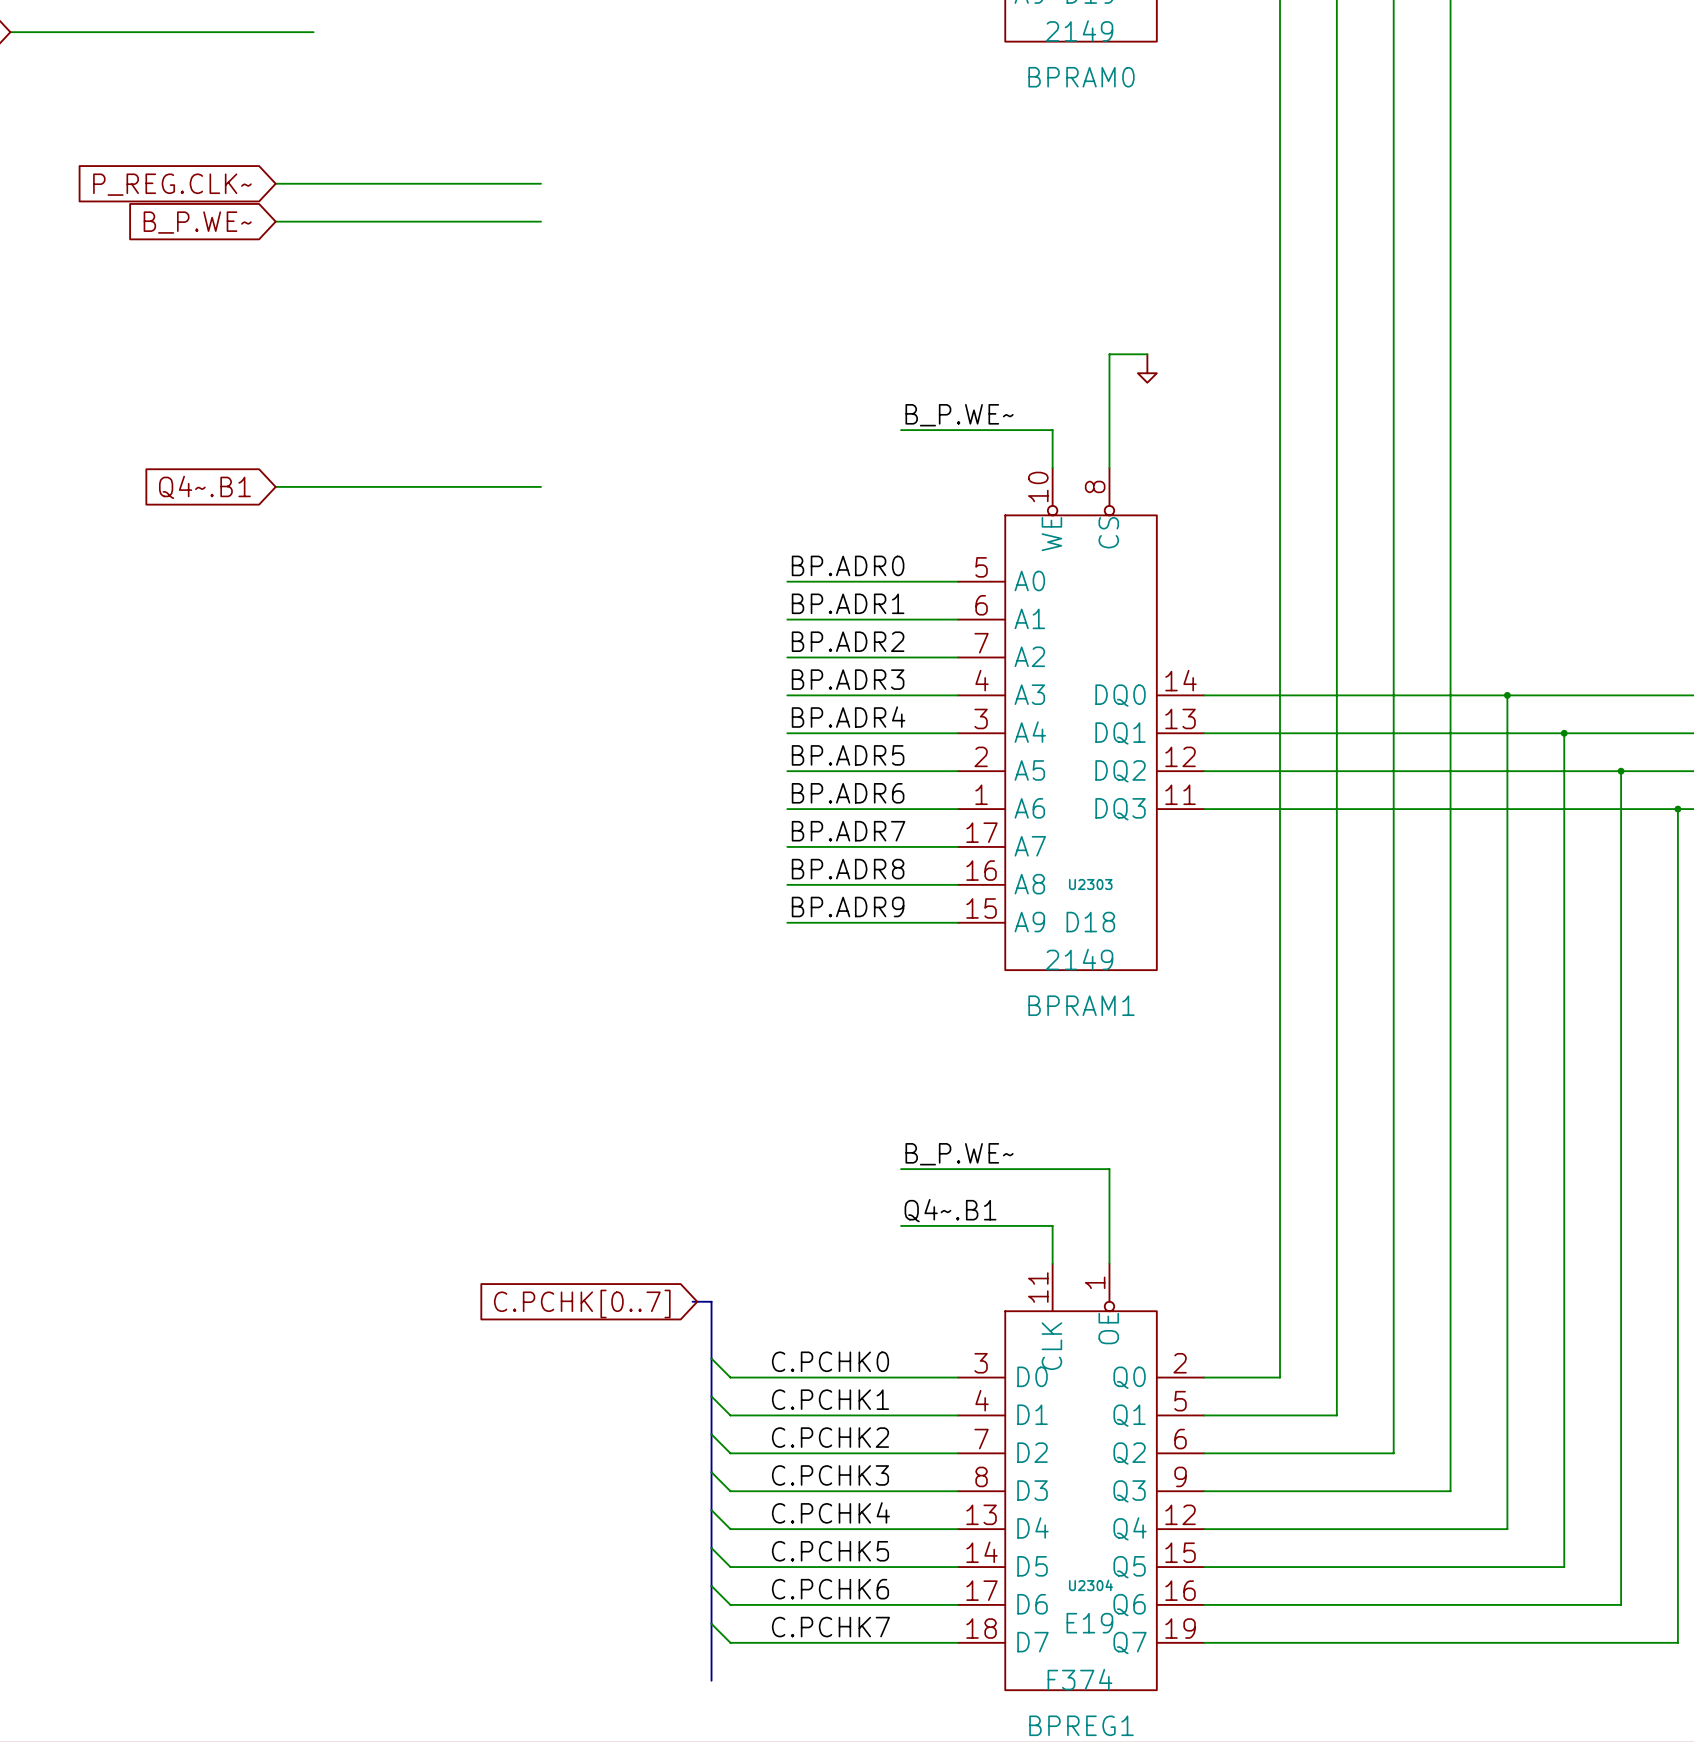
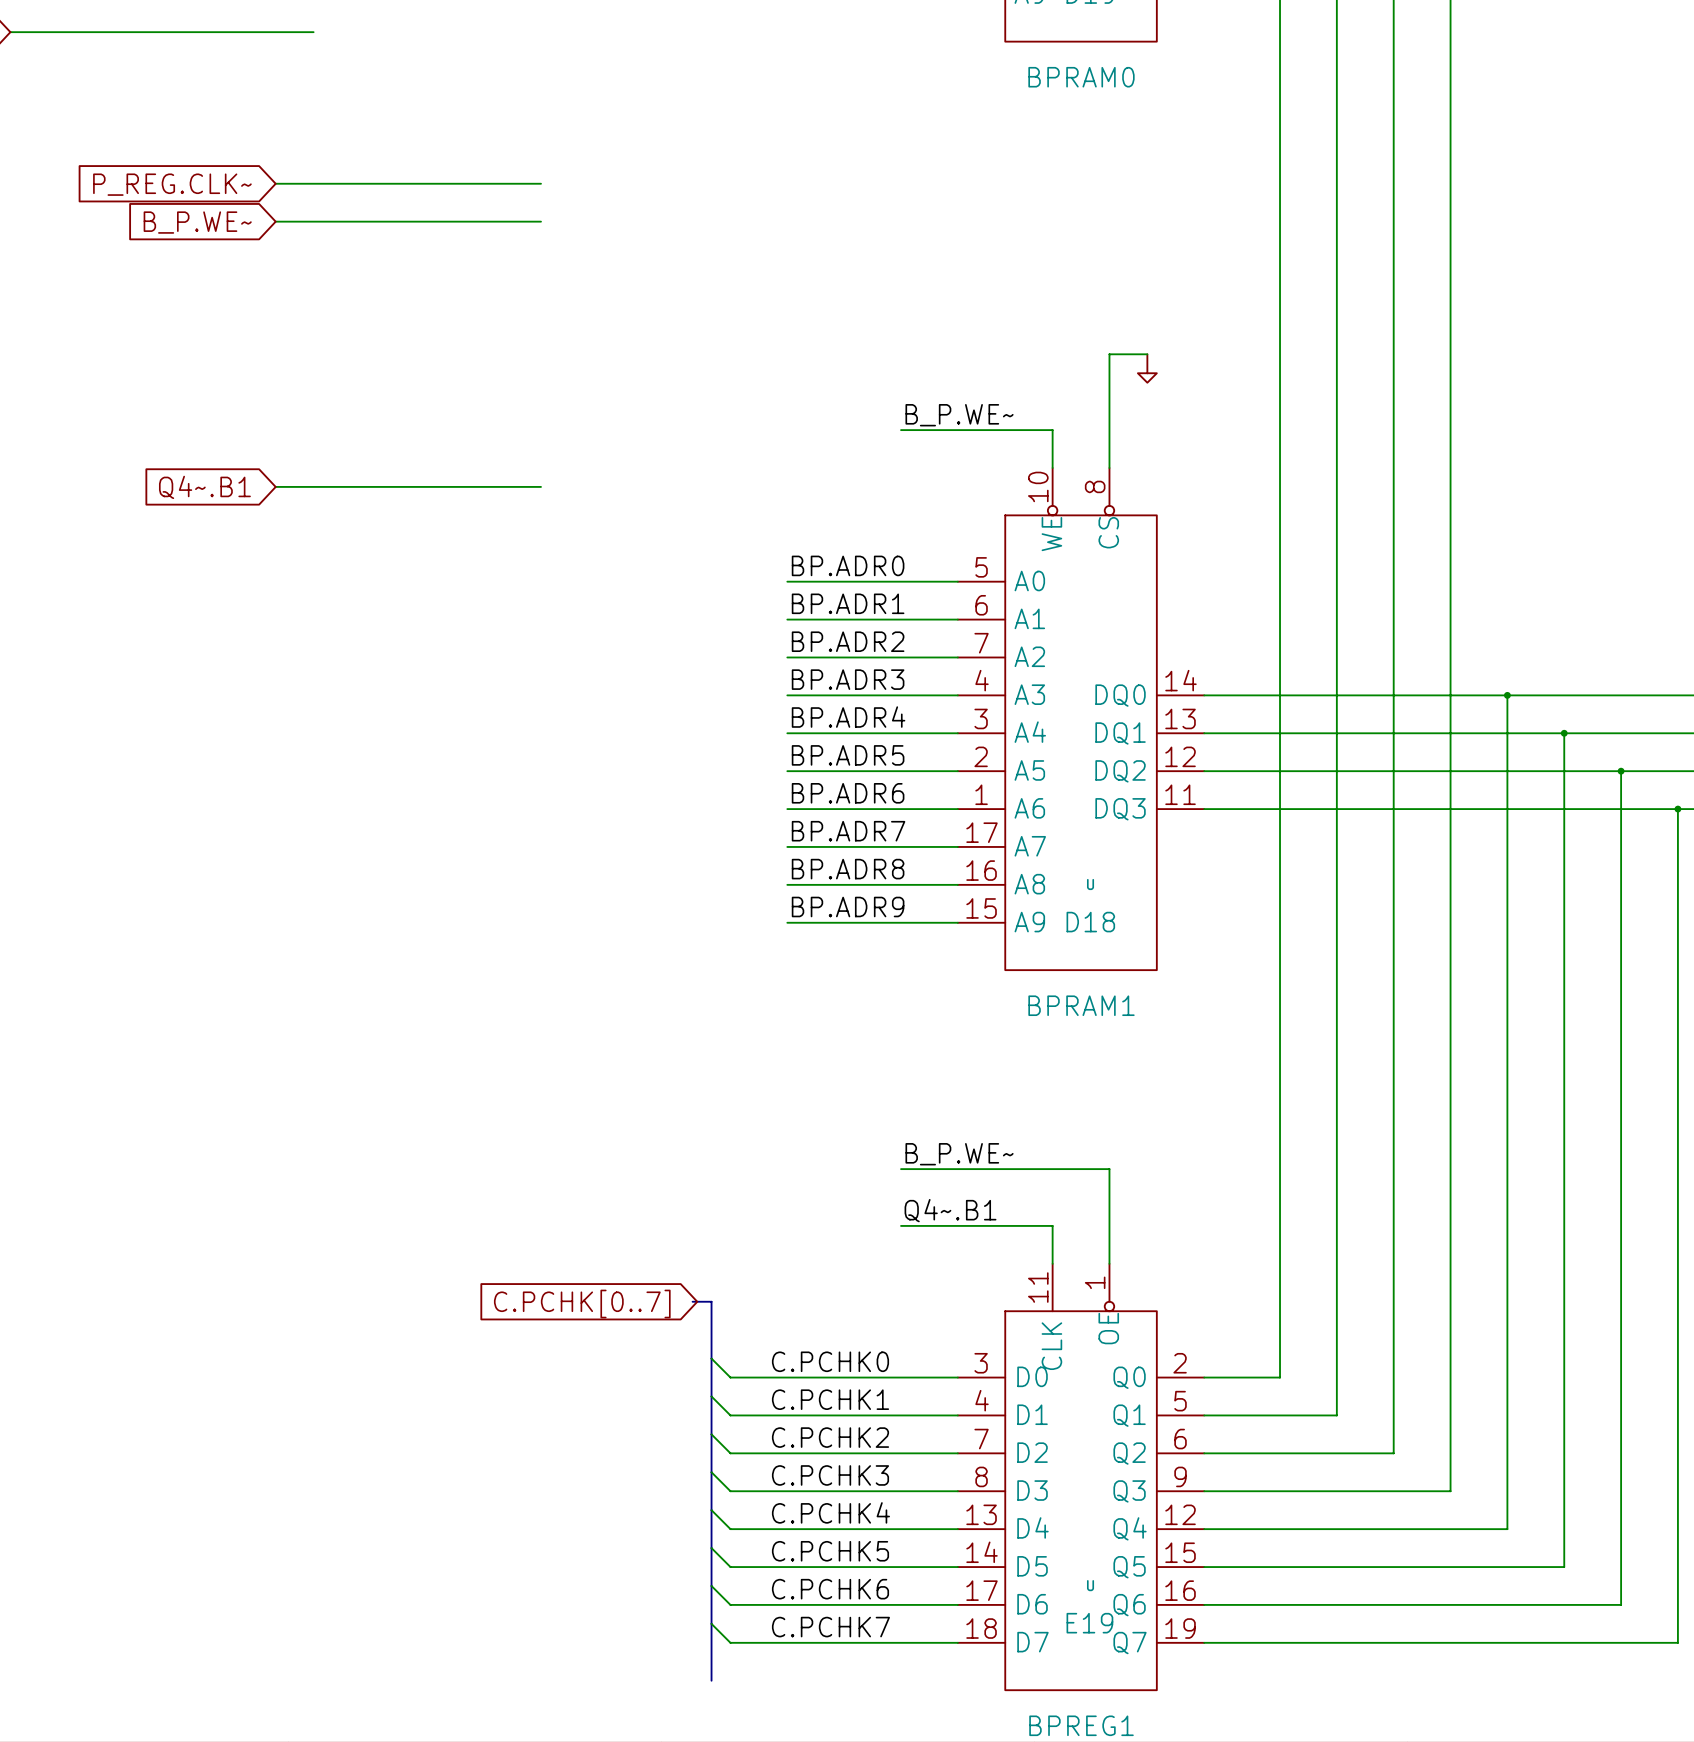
part value: 2149 (1079, 31) -> none
U2303 name: U2303 (1090, 884) -> U (1090, 884)
U2303 value: 2149 (1079, 959) -> none
U2304 name: U2304 (1090, 1585) -> U (1090, 1585)
U2304 value: F374 (1079, 1679) -> none

